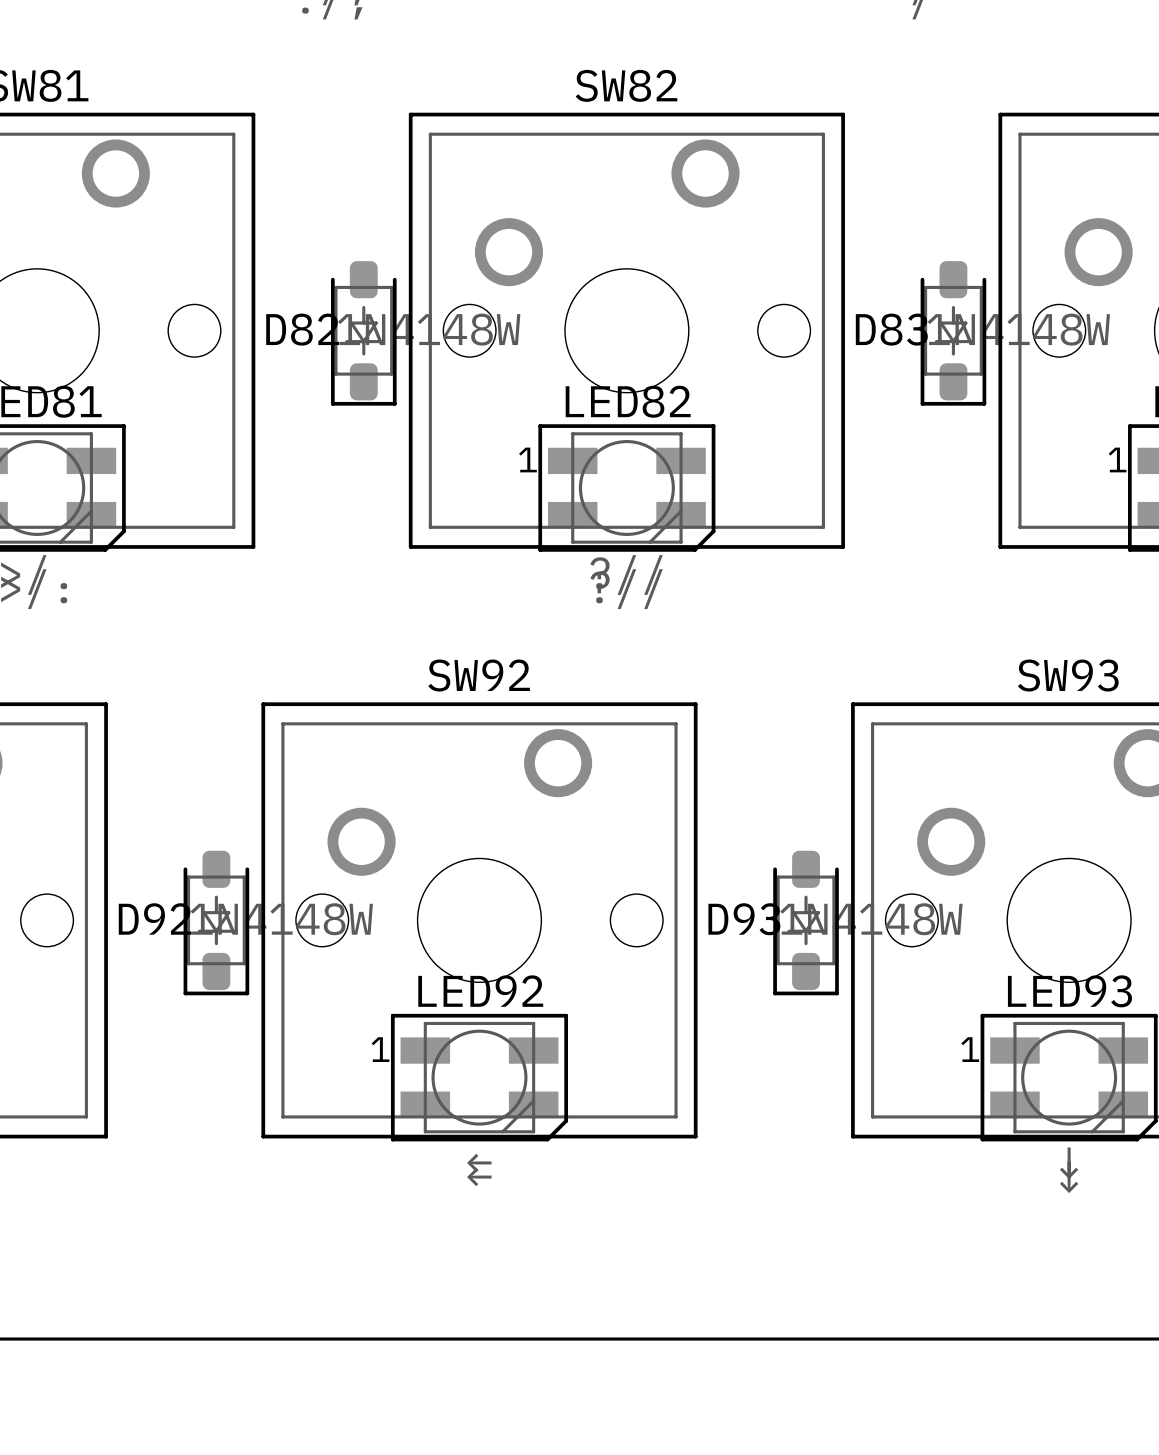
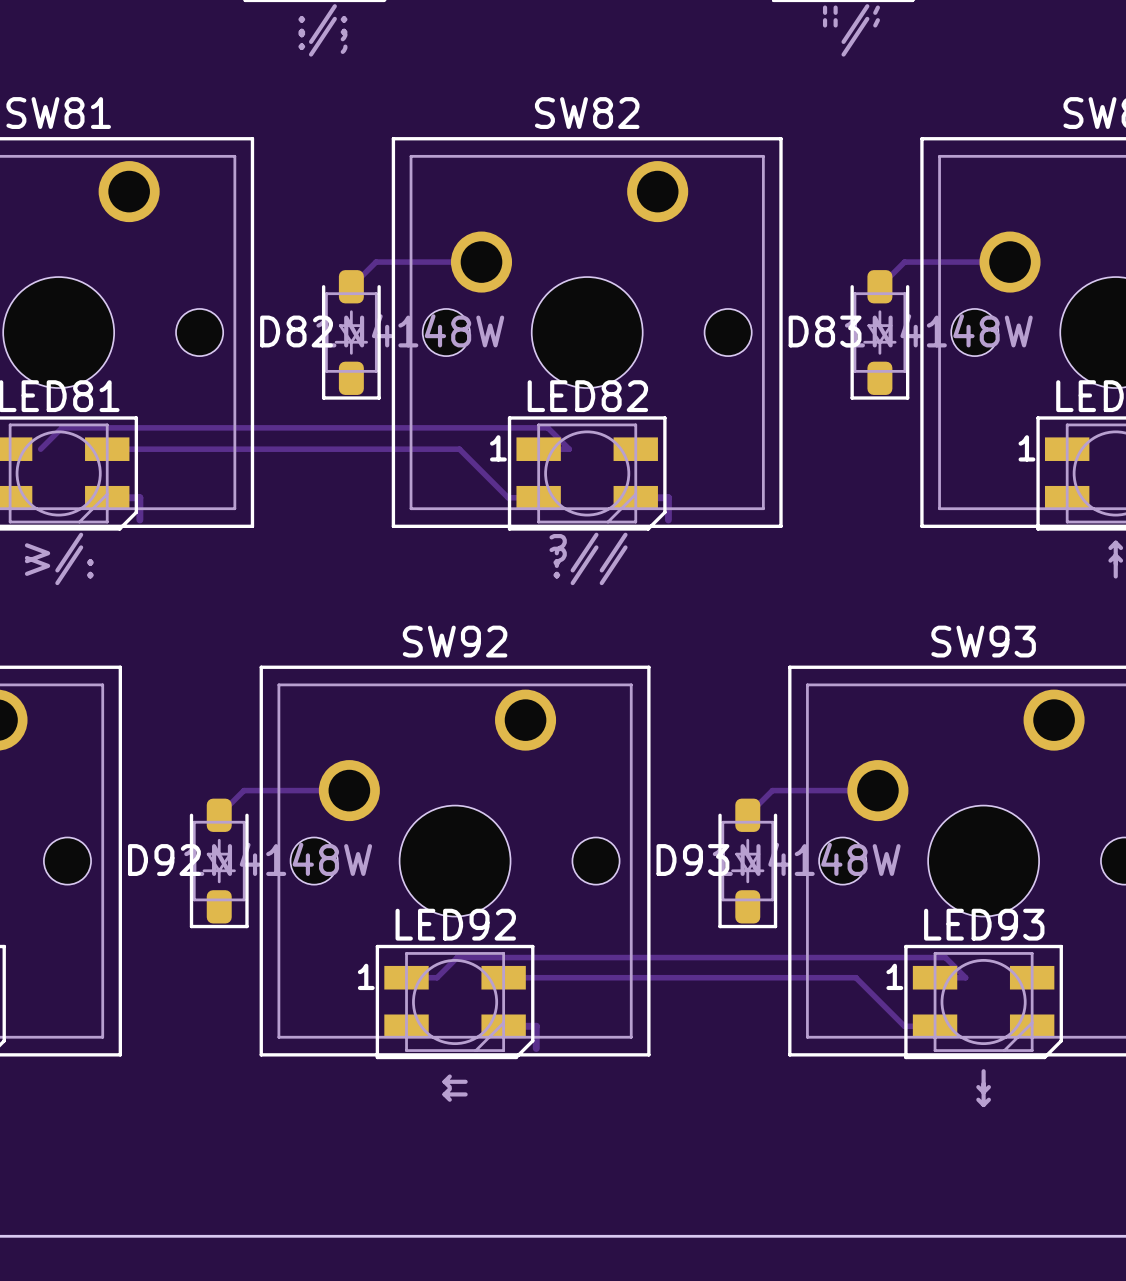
track: none -> (481, 262) (376, 262) (351, 286)
track: none -> (1010, 262) (904, 262) (879, 286)
track: none -> (40, 449) (62, 427) (547, 427) (569, 449) (538, 449)
track: none -> (107, 449) (459, 449) (508, 497) (538, 497)
track: none -> (107, 497) (139, 497) (139, 519)
track: none -> (635, 497) (668, 497) (668, 519)
track: none -> (349, 790) (243, 790) (219, 815)
track: none -> (877, 790) (772, 790) (747, 815)
track: none -> (406, 977) (437, 977) (457, 957) (945, 957) (965, 977) (935, 977)
track: none -> (503, 977) (855, 977) (904, 1026) (935, 1026)
track: none -> (503, 1026) (536, 1026) (536, 1048)

